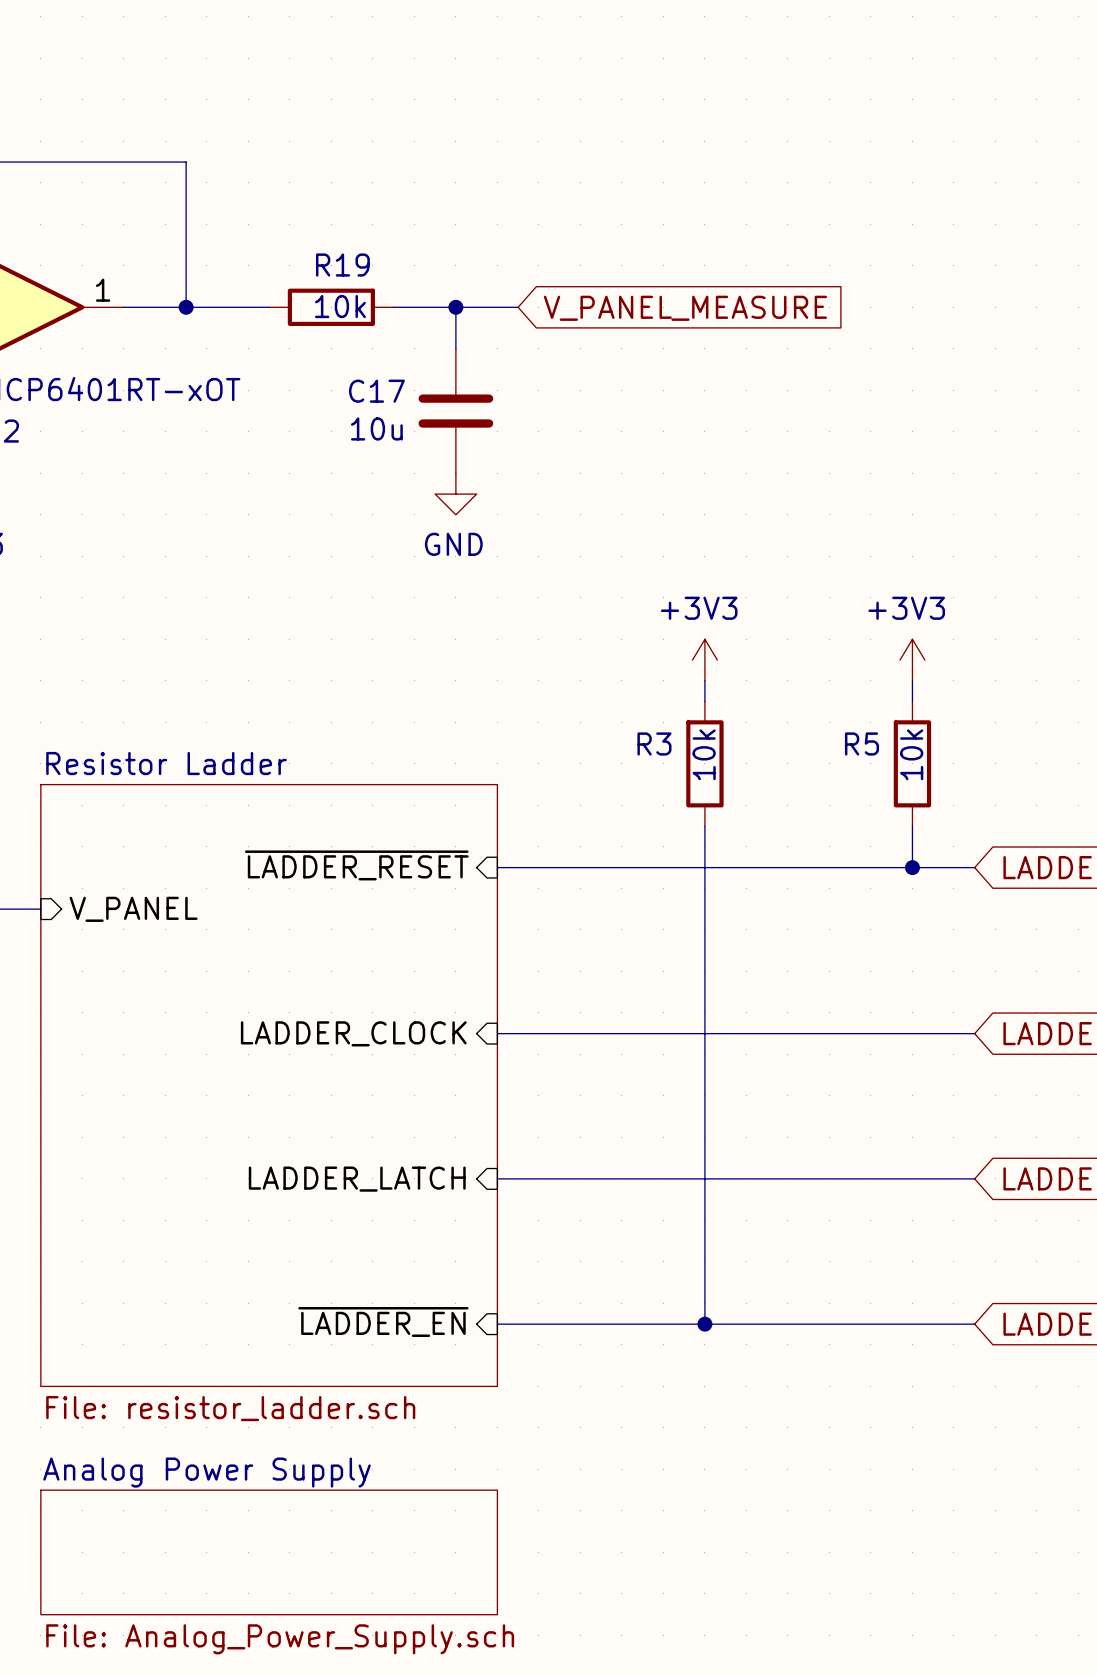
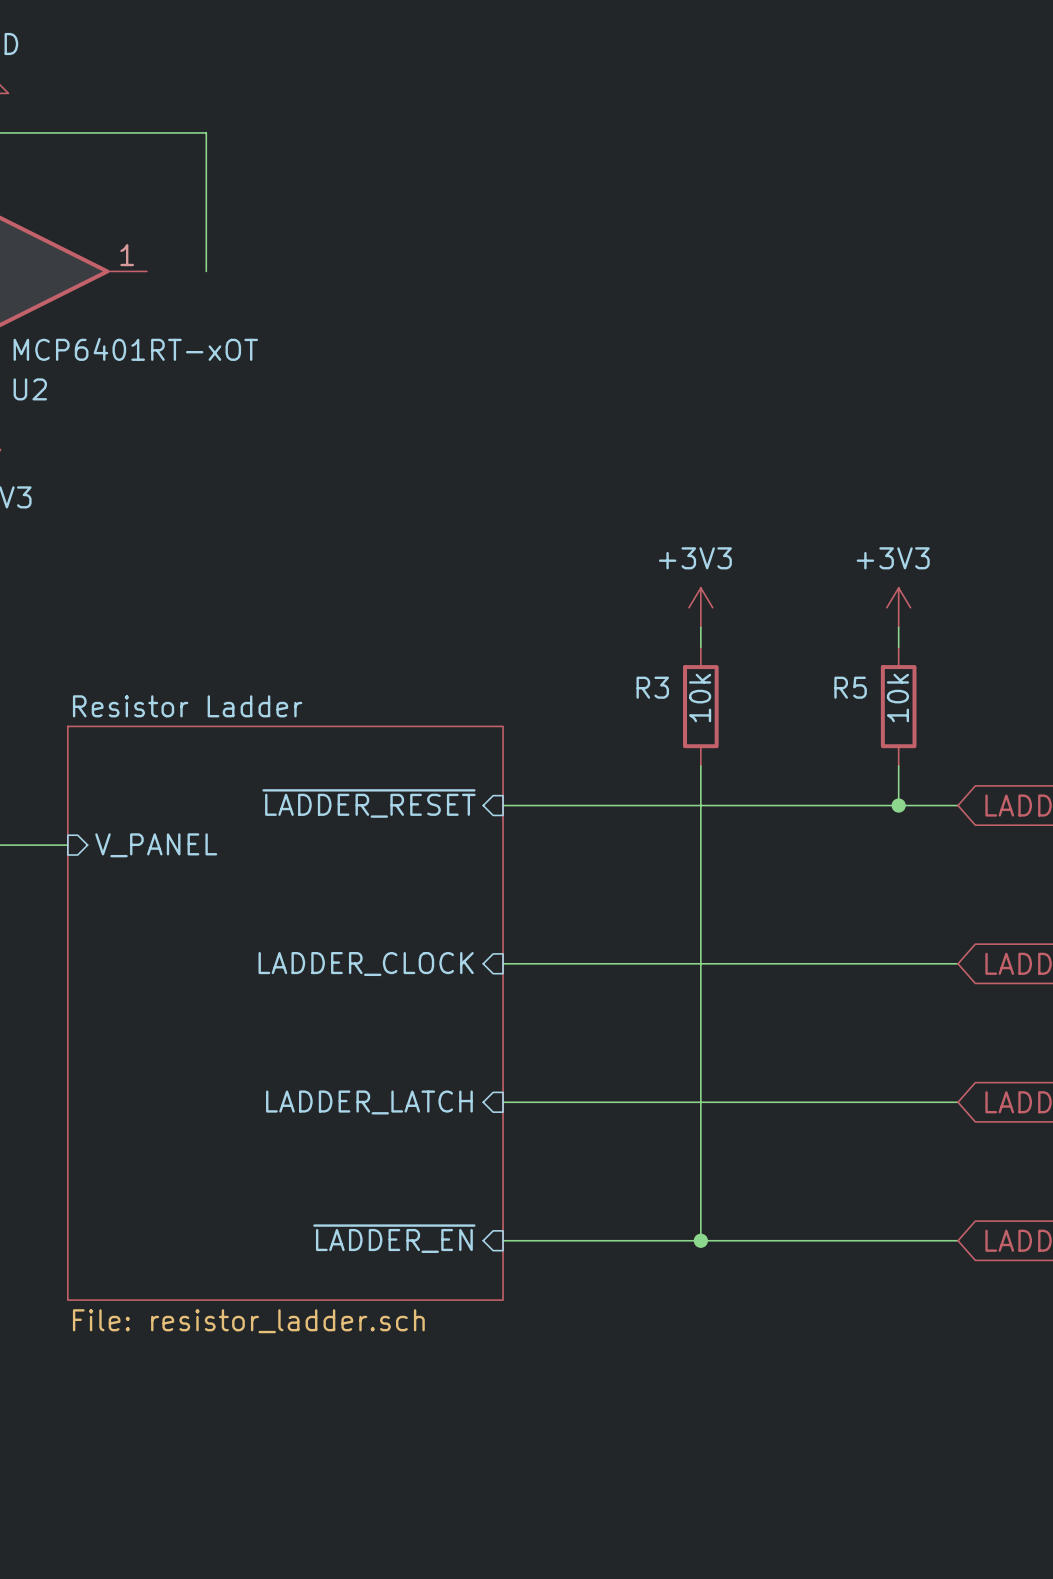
wire: (123, 307) (269, 307) -> none
junction: (186, 307) -> none
R19: 10k (331, 307) -> none
wire: (393, 307) (518, 307) -> none
wire: (455, 307) (455, 348) -> none
junction: (455, 307) -> none
global label: V_PANEL_MEASURE (685, 308) -> none
C17: 10u (455, 411) -> none
power symbol: GND (455, 494) -> none
sheet Analog Power Supply: File: Analog_Power_Supply.sch (269, 1552) -> none

